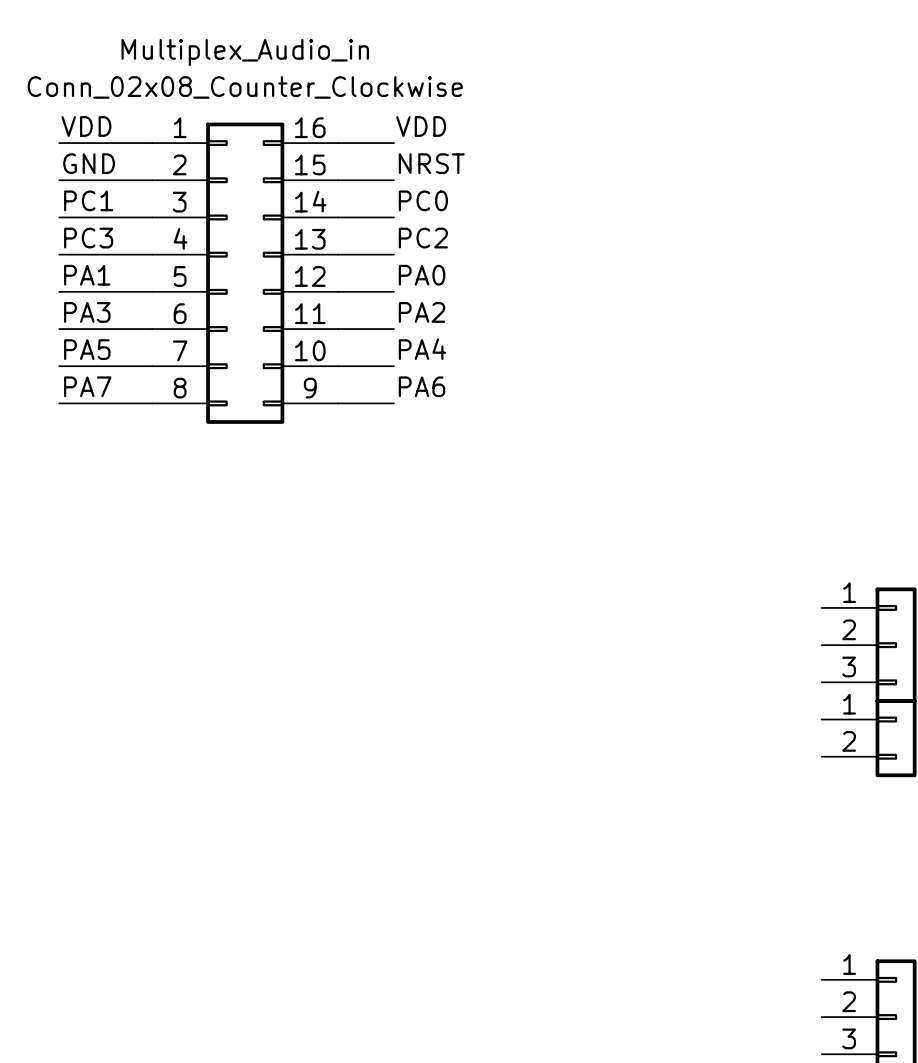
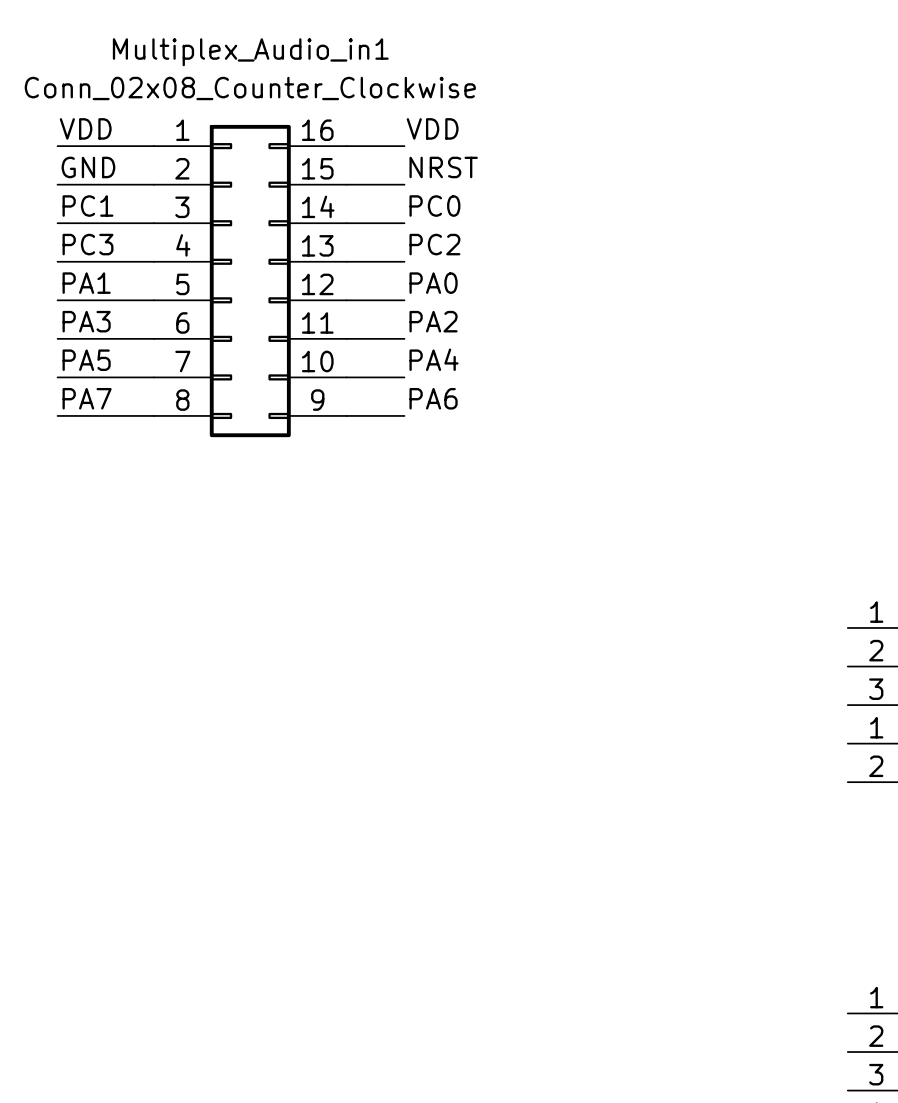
Multiplex_Audio_in name: Multiplex_Audio_in (245, 52) -> Multiplex_Audio_in1 (250, 52)

